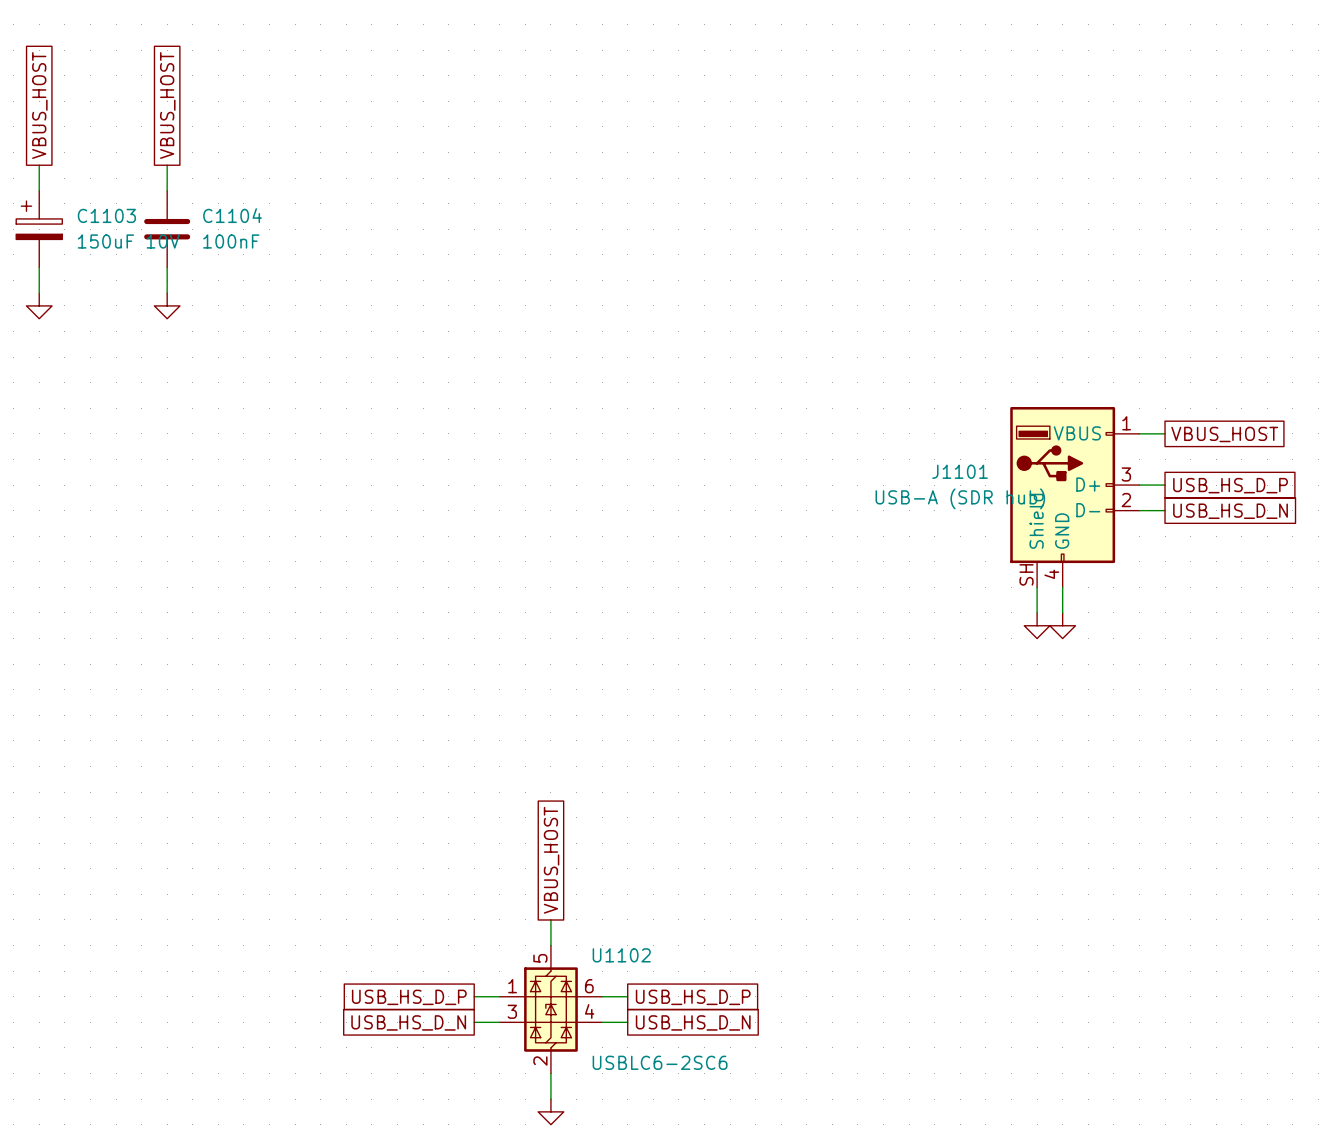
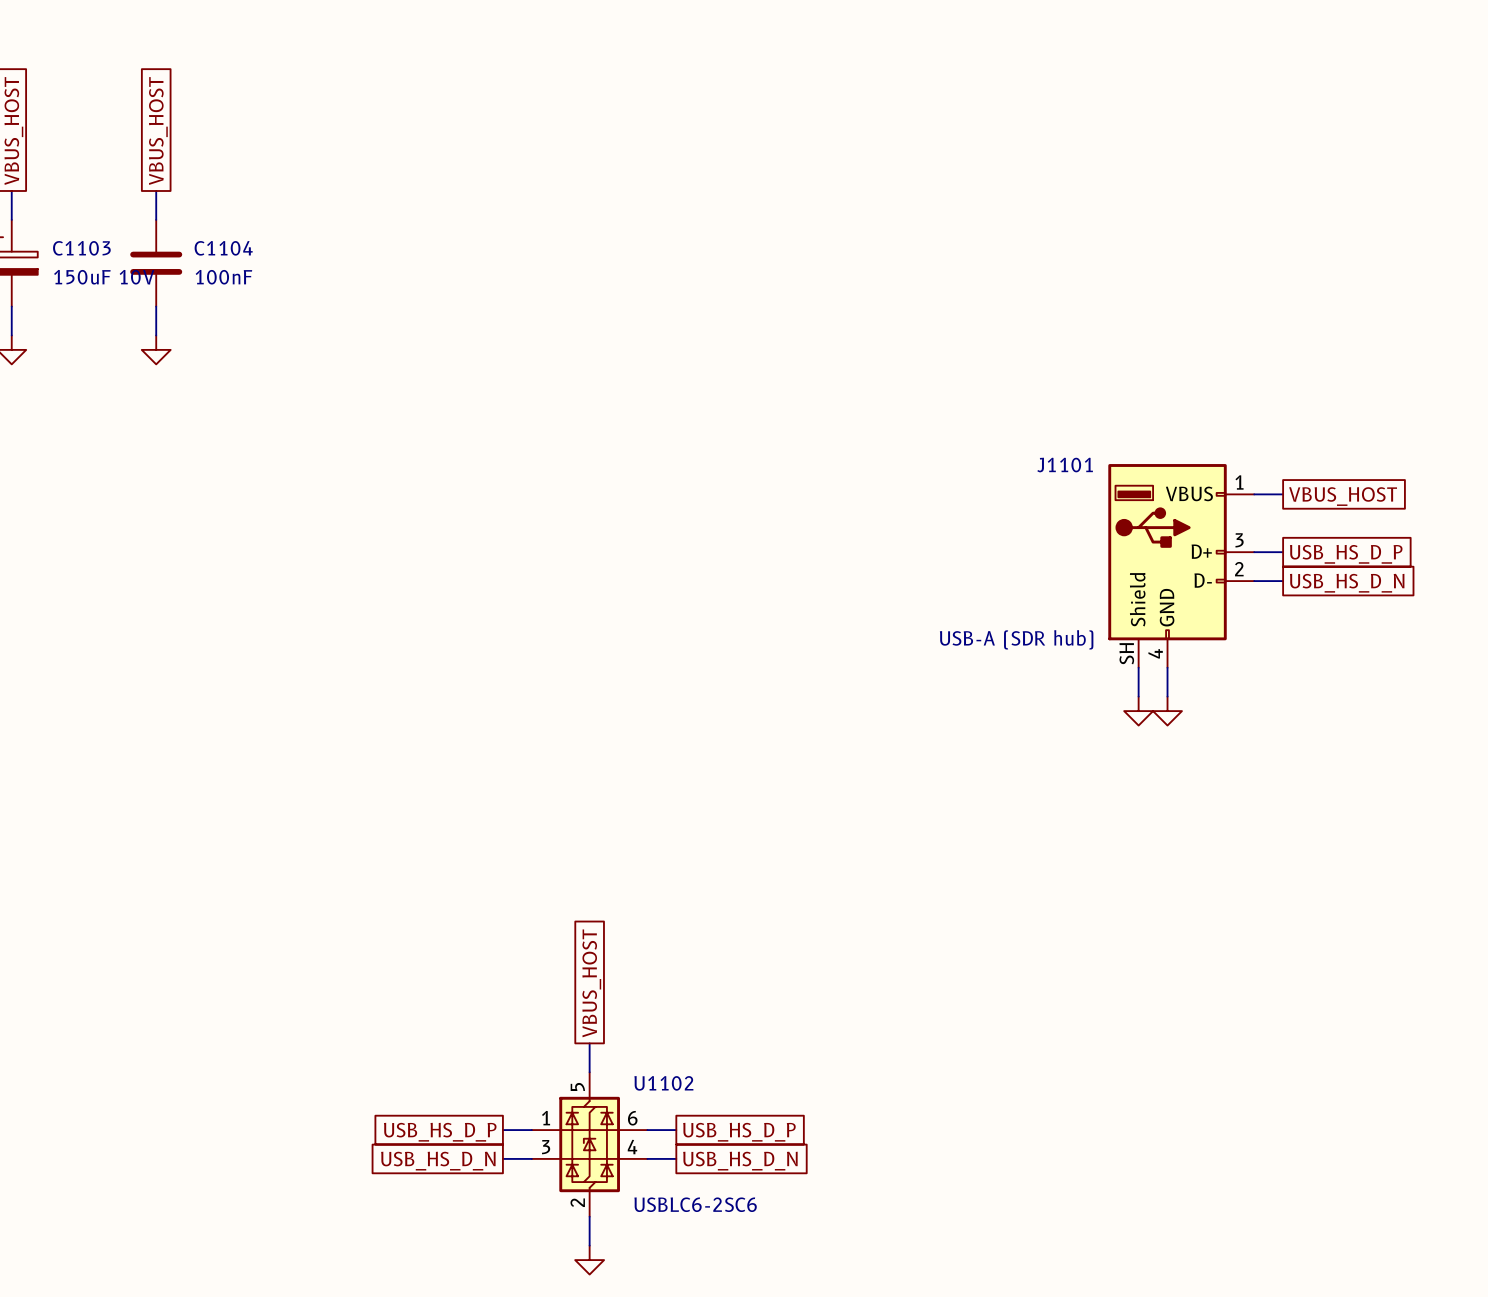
J1101 name position: J1101 (960, 471) -> J1101 (1065, 465)
J1101 value position: USB-A (SDR hub) (960, 498) -> USB-A (SDR hub) (1016, 639)

